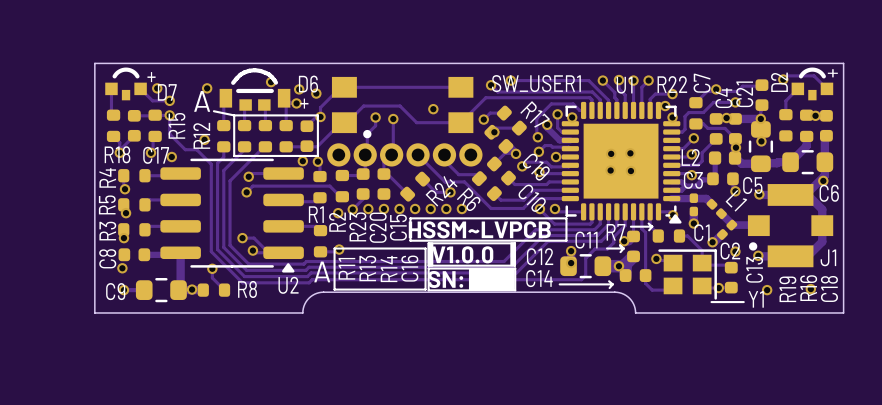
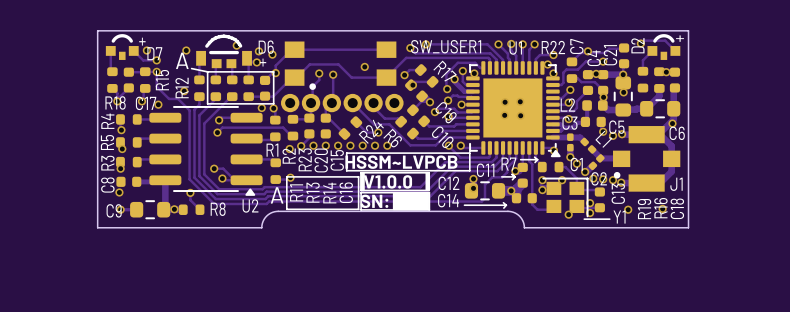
via: none -> (613, 135)
via: none -> (576, 163)
via: none -> (593, 178)
via: none -> (542, 180)
via: none -> (562, 180)
via: none -> (613, 180)
via: (656, 258) -> none
via: none -> (542, 190)
via: none -> (590, 203)
via: (718, 288) -> none
via: none -> (590, 213)
via: none -> (568, 214)

